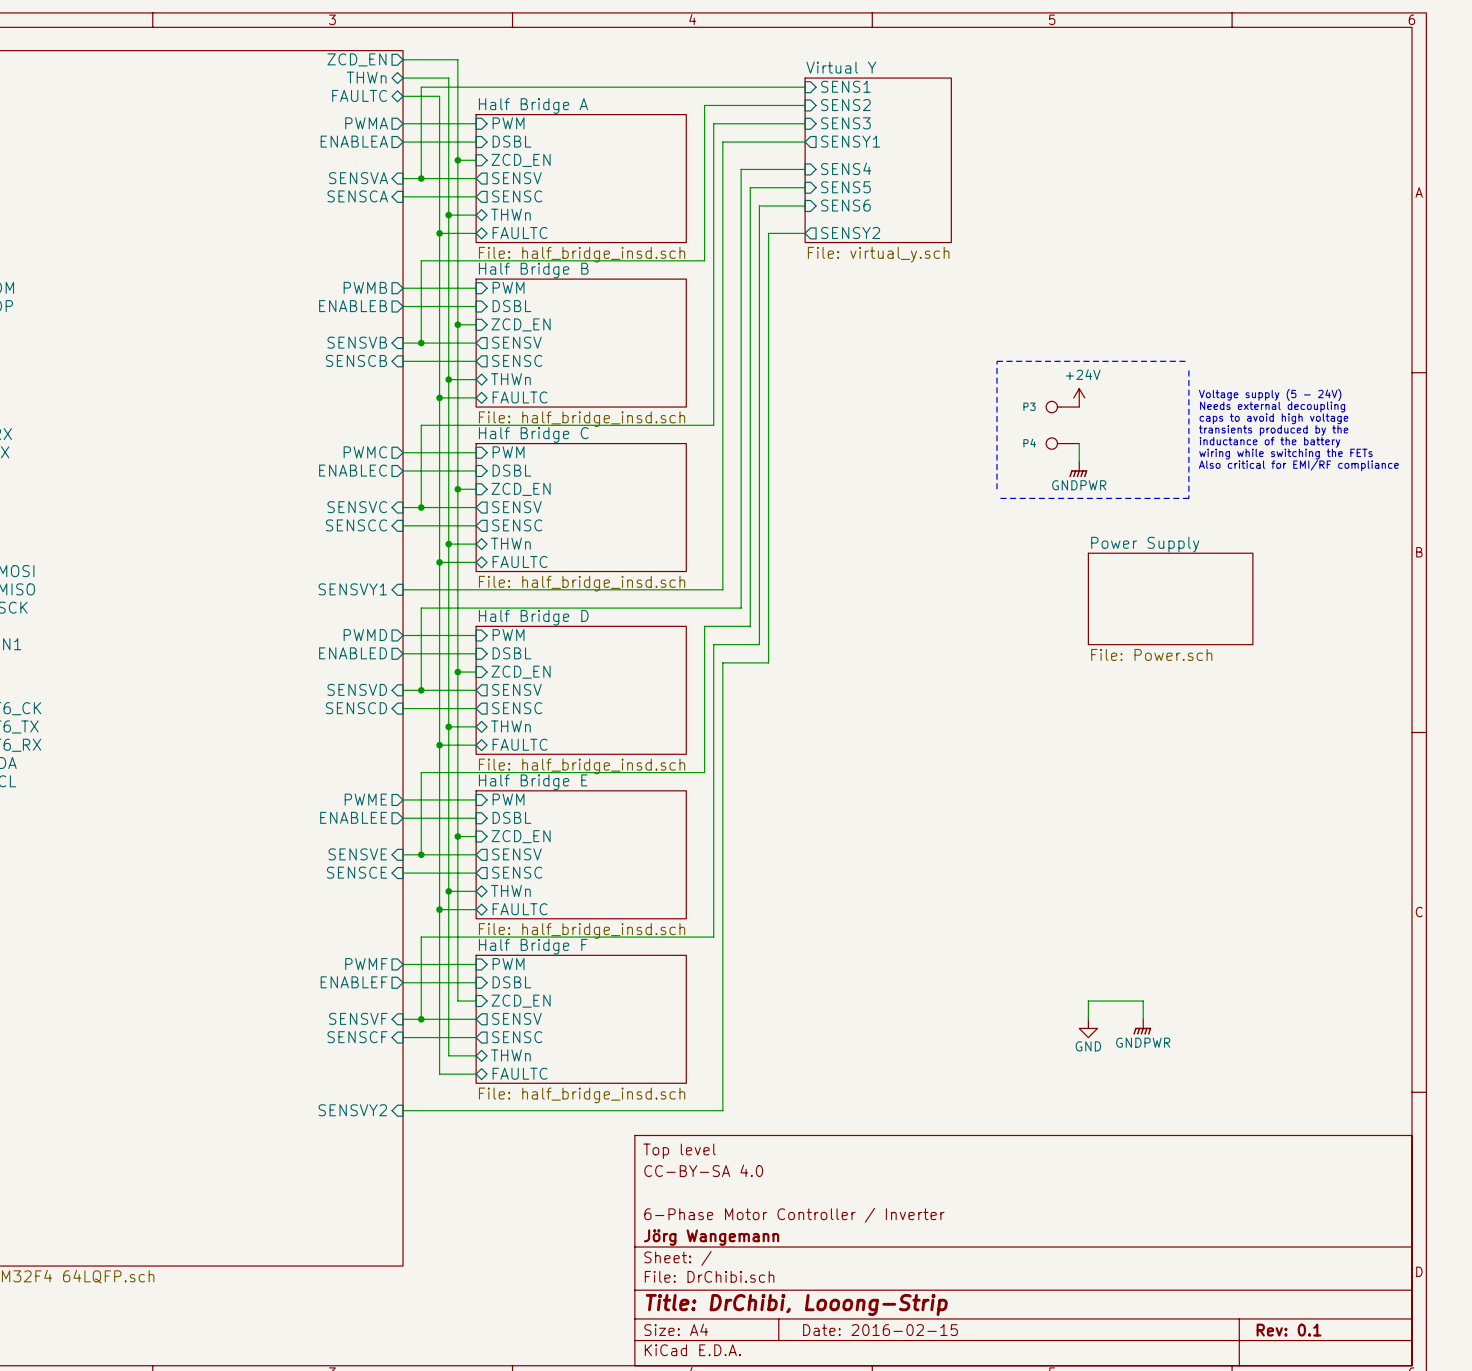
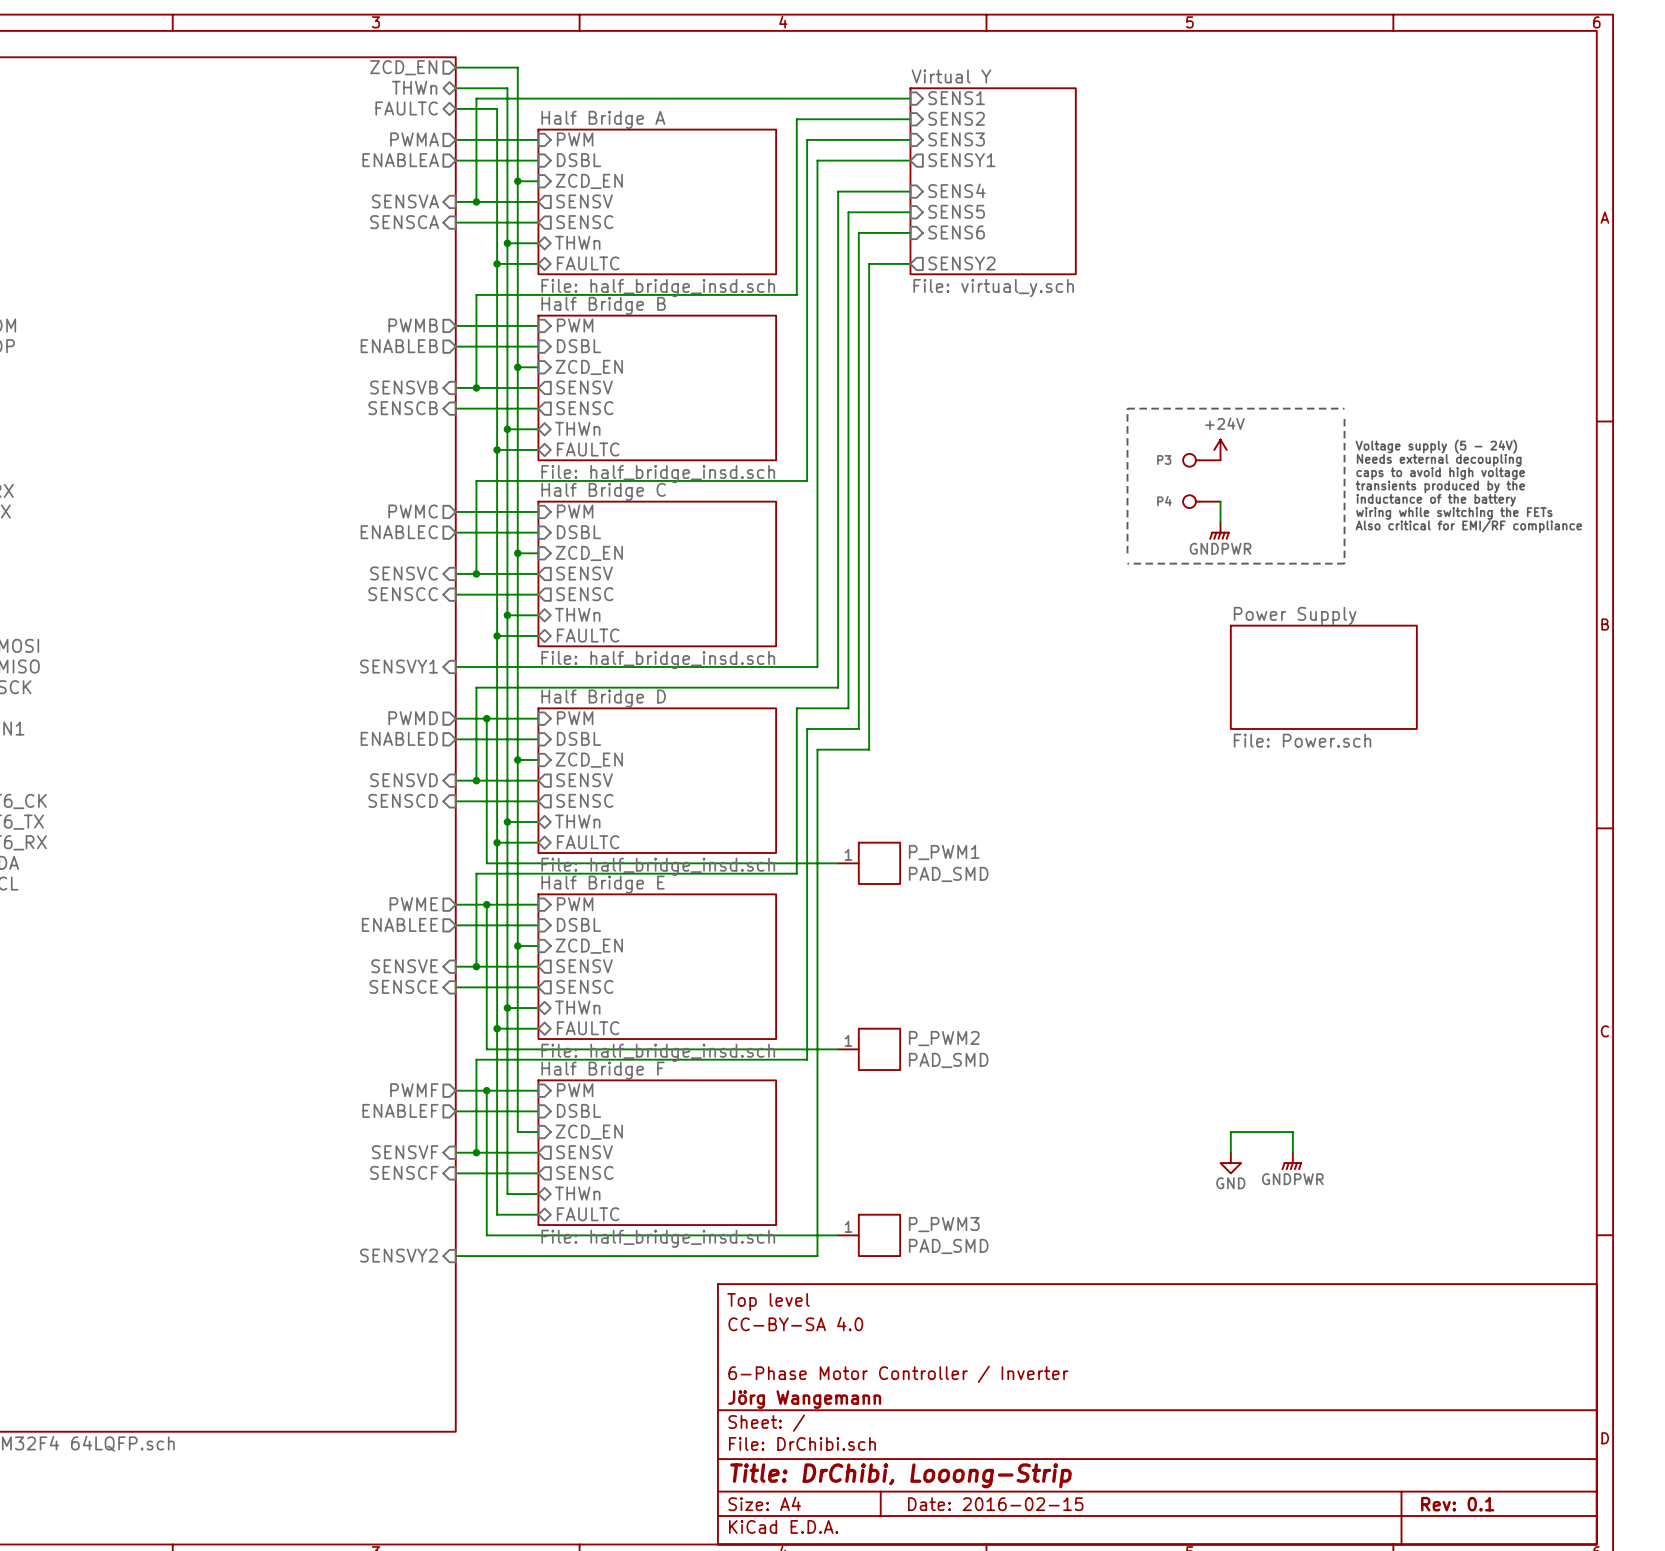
wire: none -> (486, 718) (486, 863) (838, 863)
junction: none -> (486, 718)
P_PWM1: none -> PAD_SMD (869, 863)
wire: none -> (486, 904) (486, 1049) (838, 1049)
junction: none -> (486, 904)
P_PWM2: none -> PAD_SMD (869, 1049)
wire: none -> (486, 1090) (486, 1235) (838, 1235)
junction: none -> (486, 1090)
P_PWM3: none -> PAD_SMD (869, 1235)

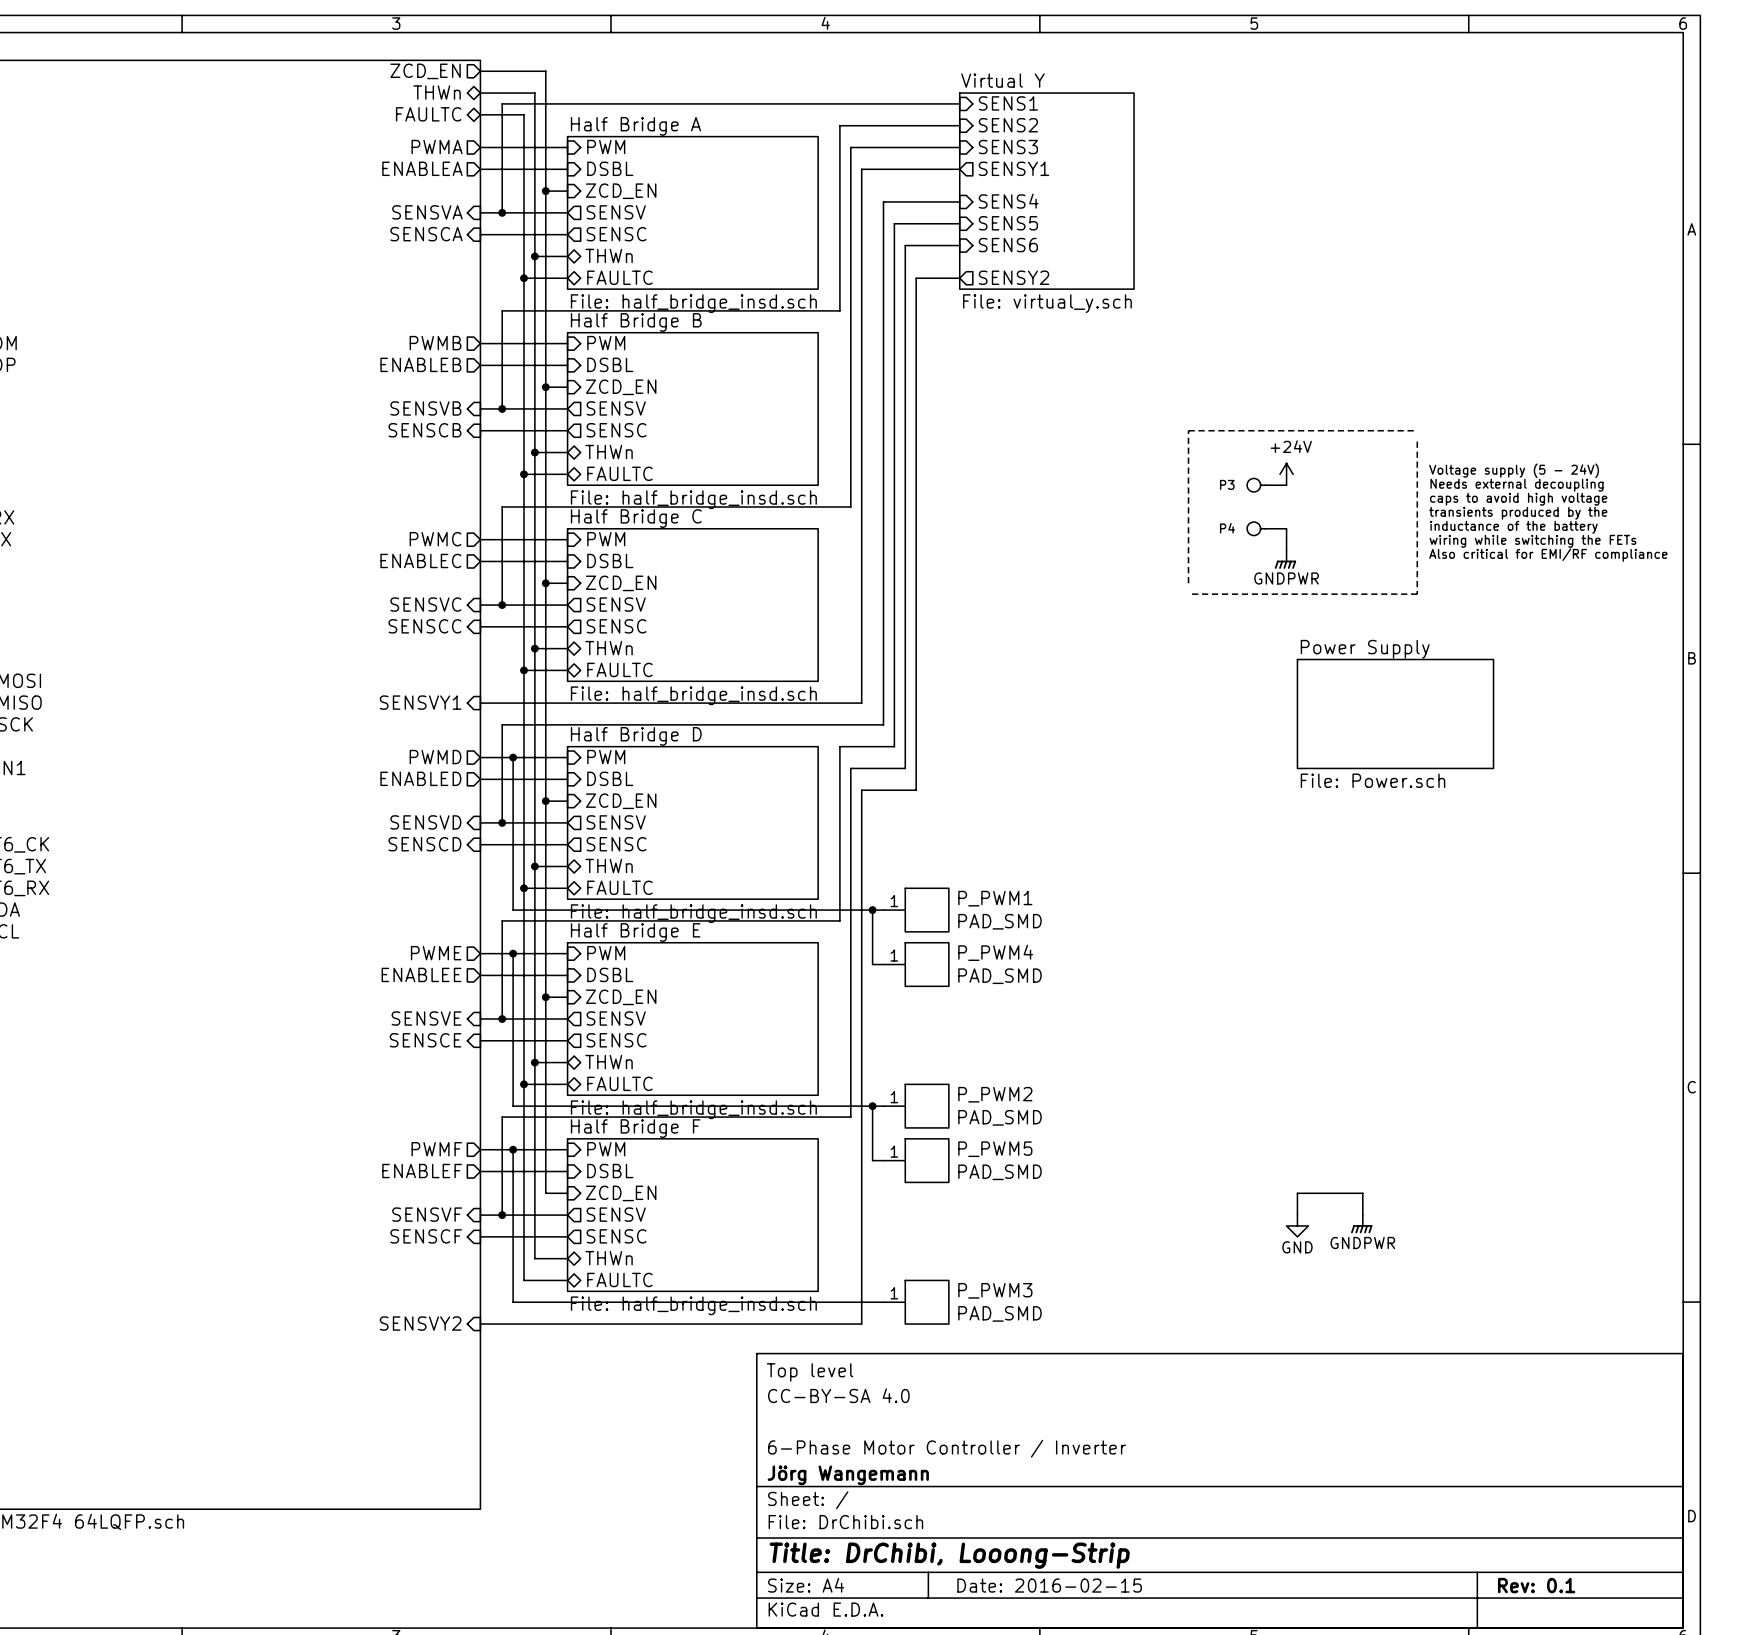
wire: none -> (872, 910) (872, 964) (883, 964)
junction: none -> (872, 910)
P_PWM4: none -> PAD_SMD (916, 964)
wire: none -> (872, 1106) (872, 1160) (883, 1160)
junction: none -> (872, 1106)
P_PWM5: none -> PAD_SMD (916, 1160)

